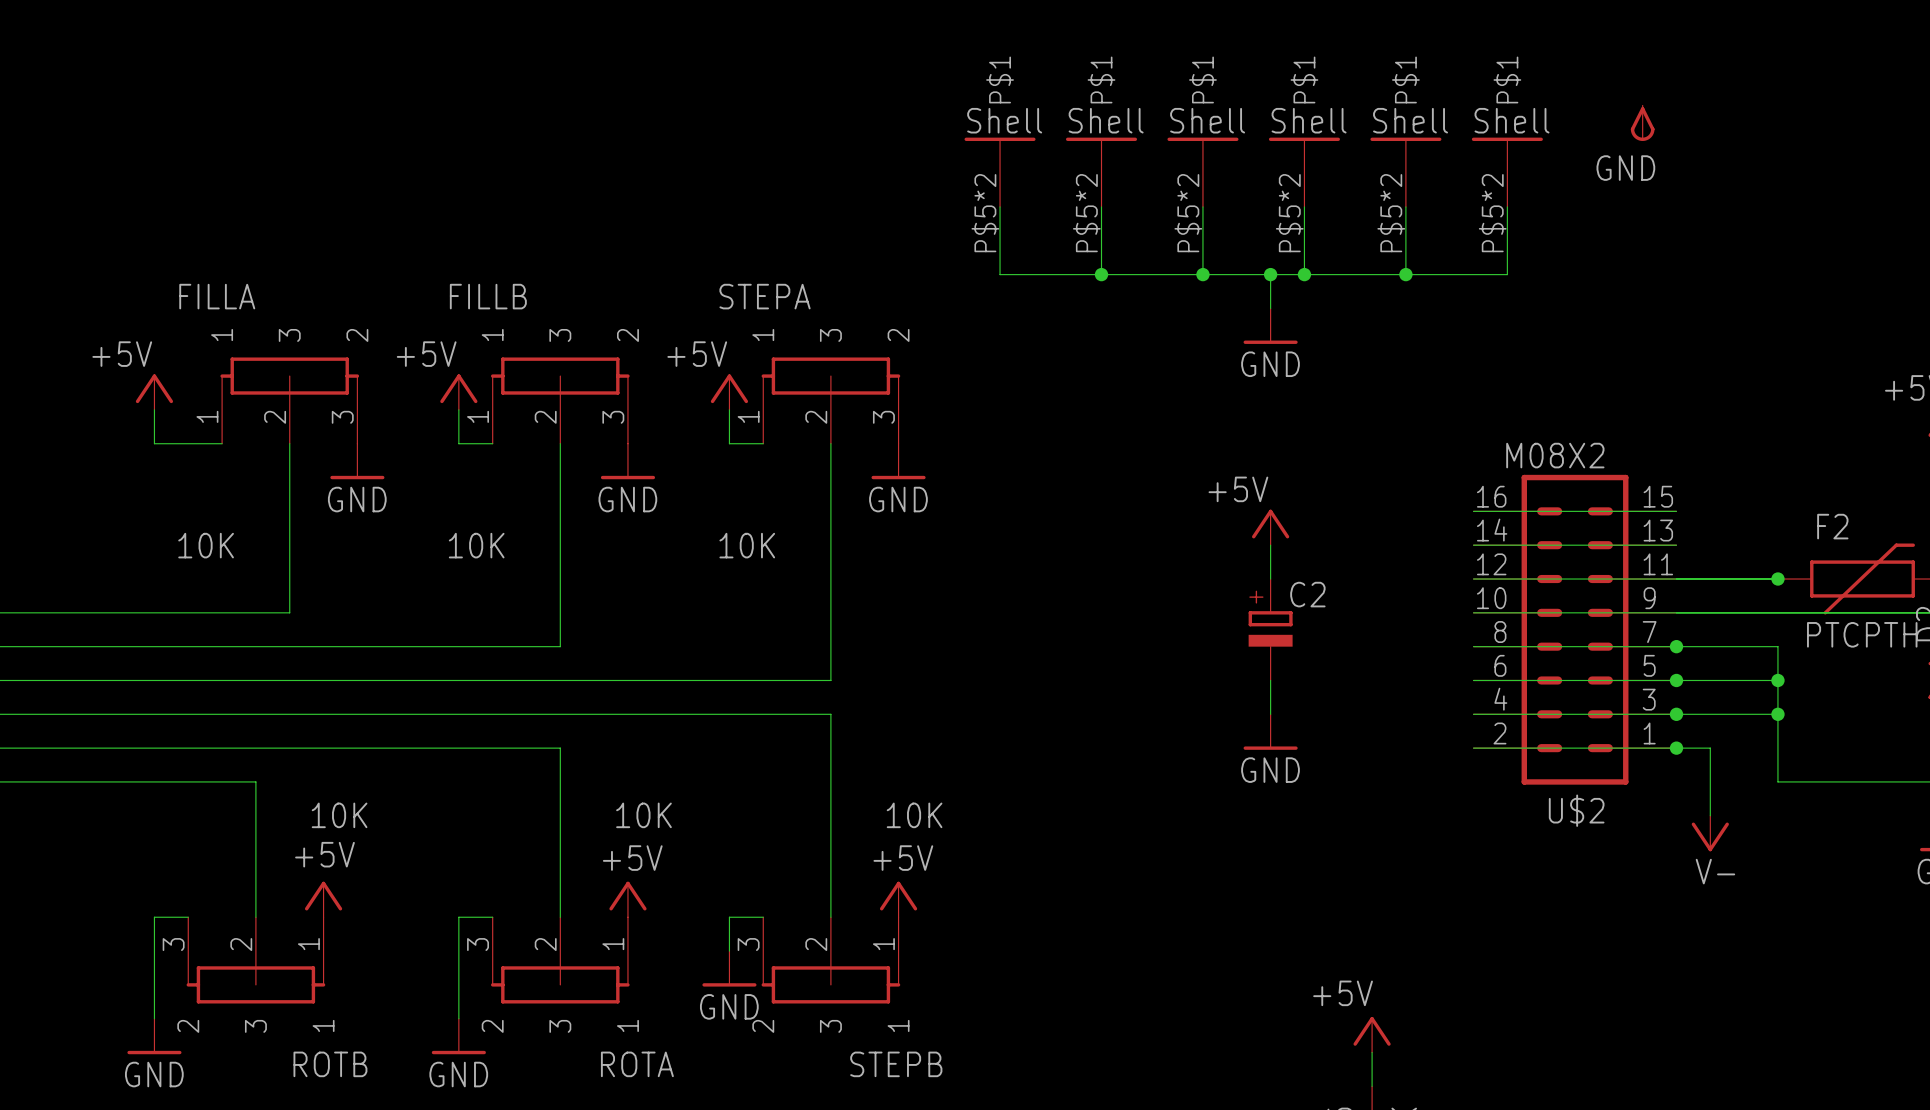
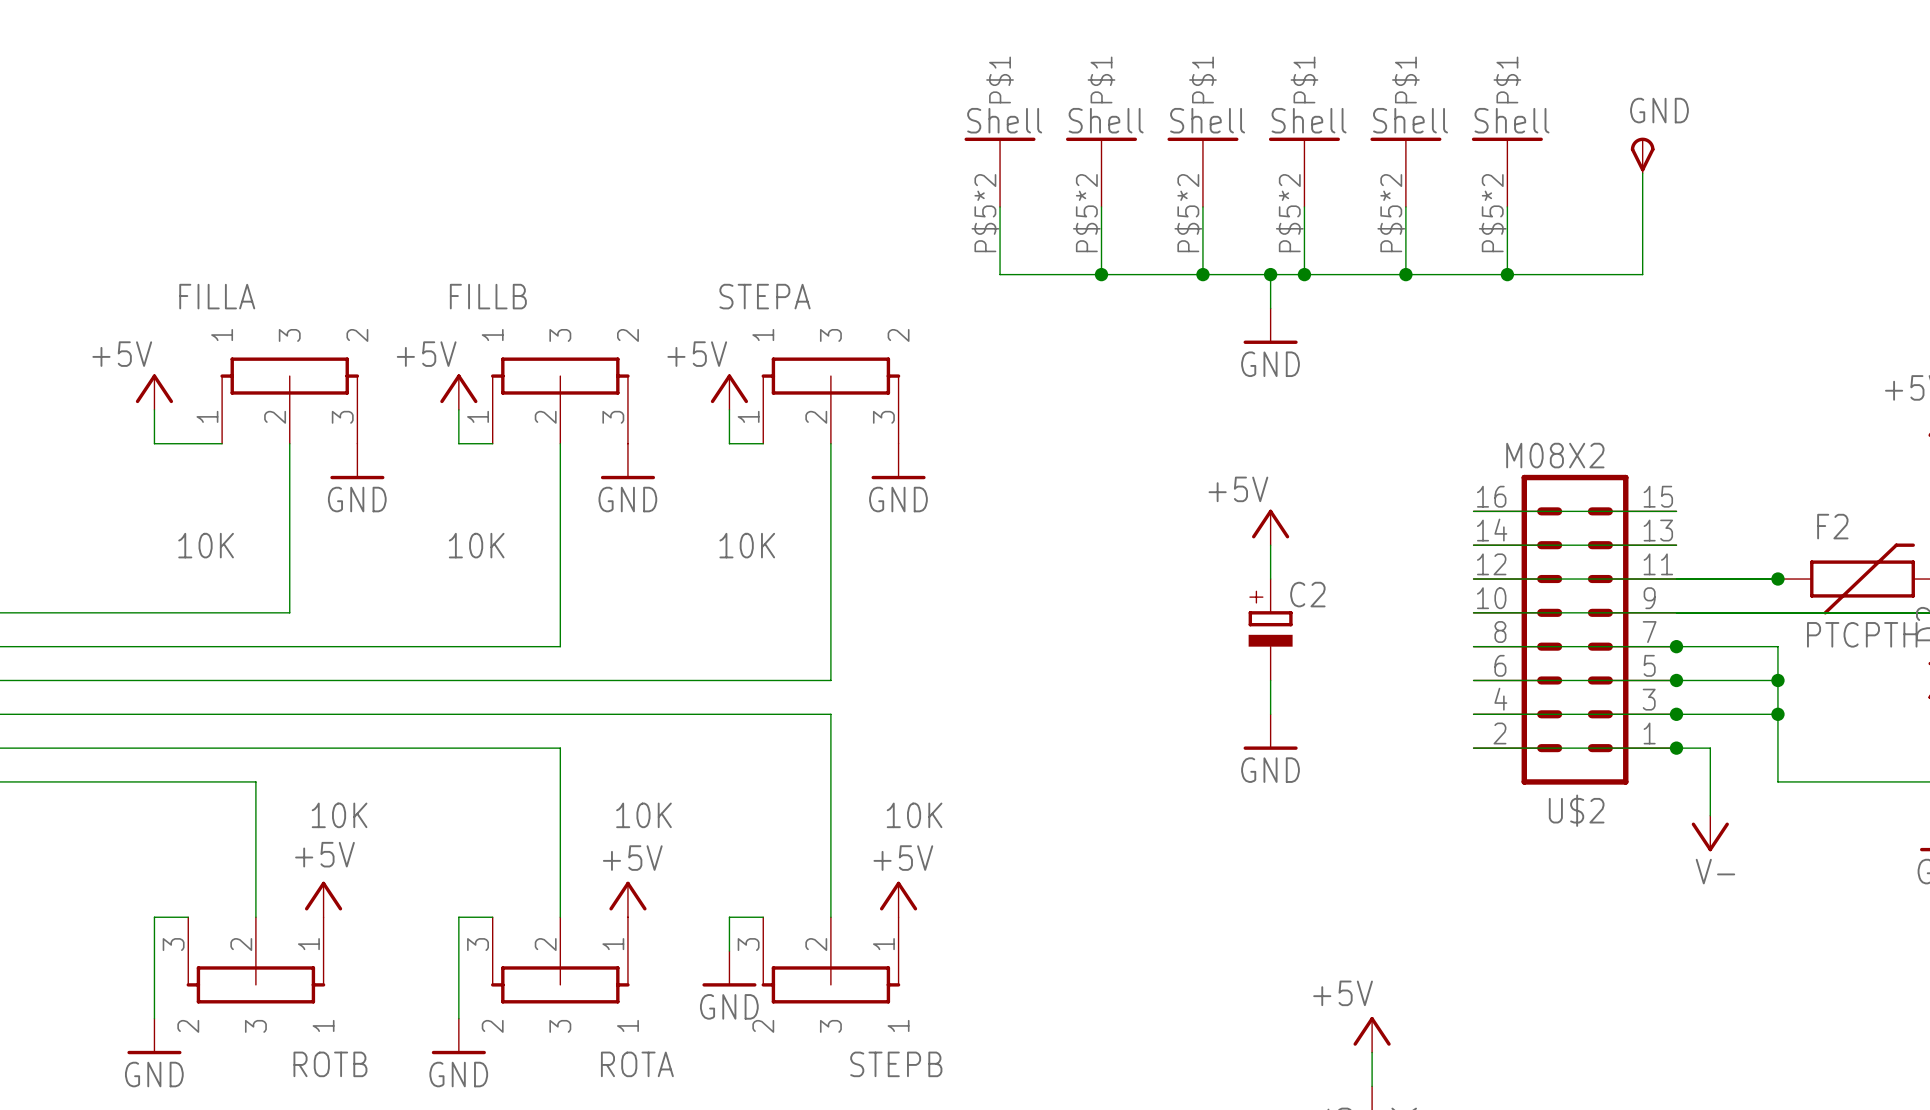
GND position: (1642, 123) -> (1642, 155)
GND rotation: 0° (1642, 124) -> 180° (1642, 154)
wire: none -> (1642, 173) (1642, 274) (1507, 274)
junction: none -> (1507, 274)

